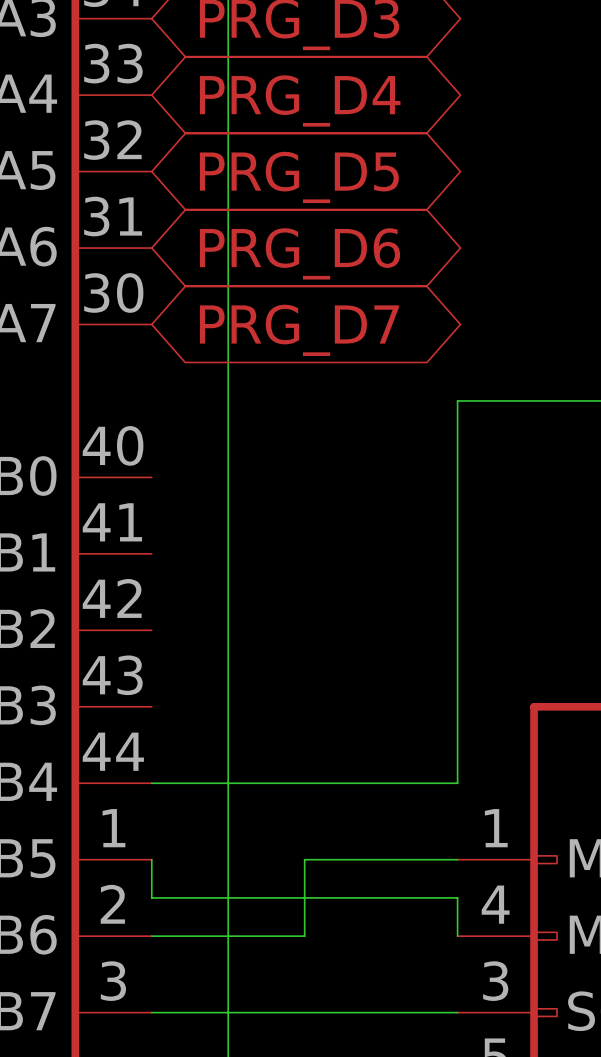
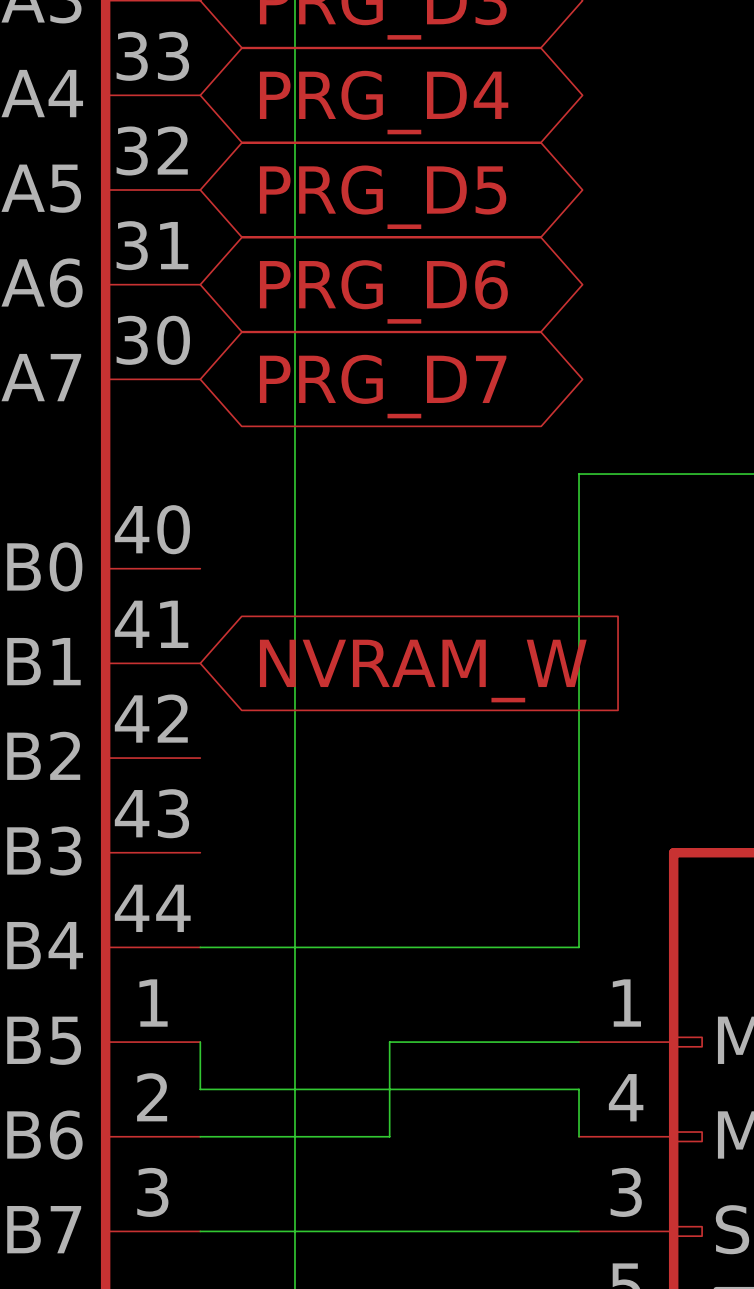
global label: none -> NVRAM_W (423, 671)

